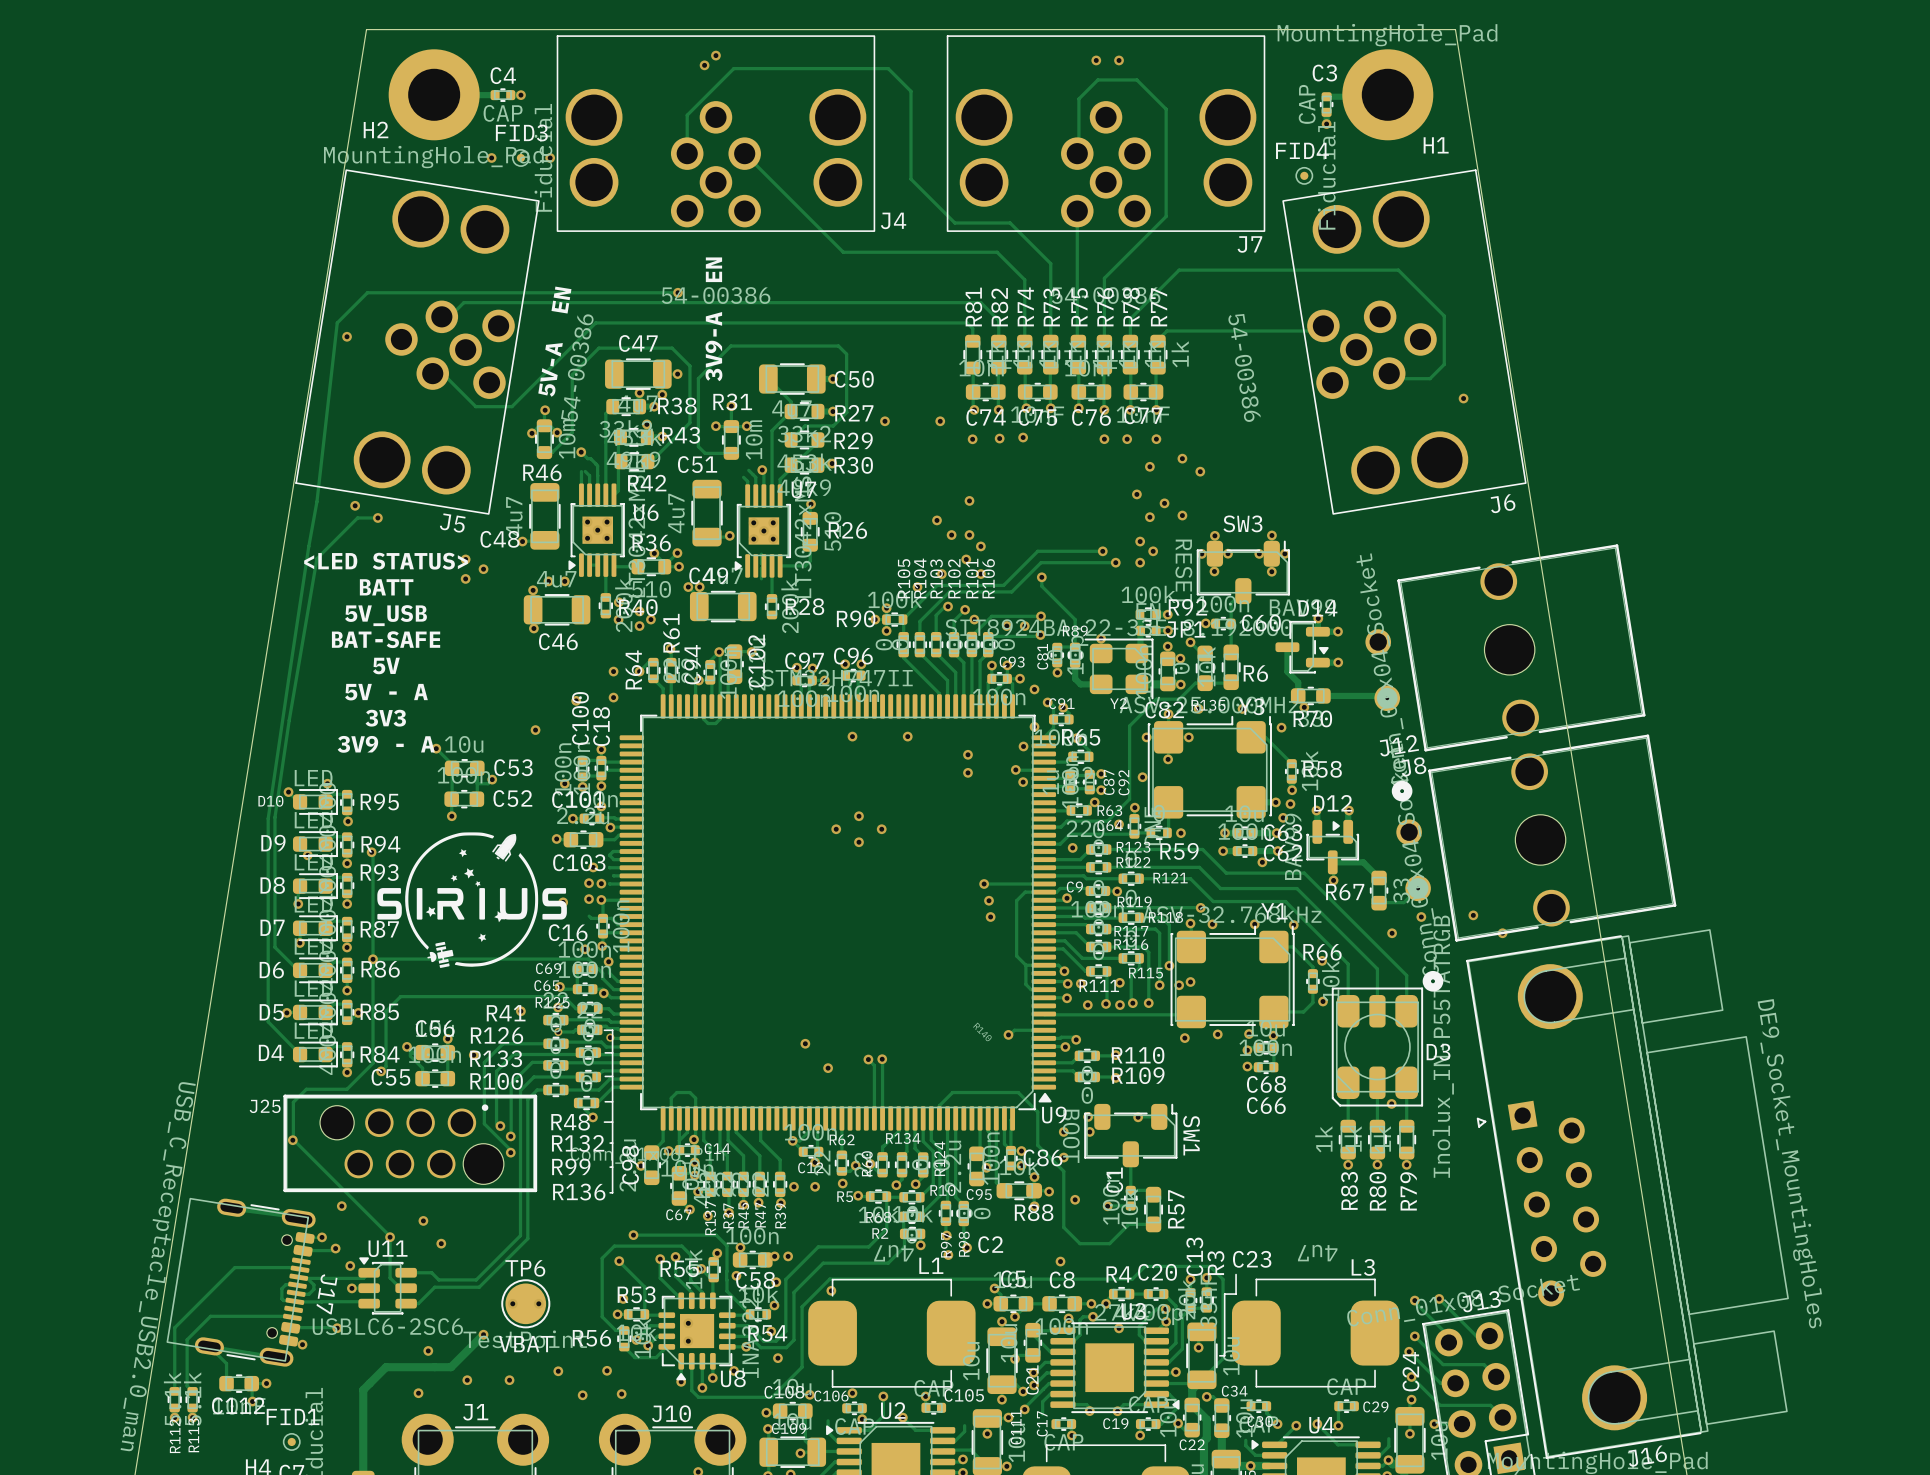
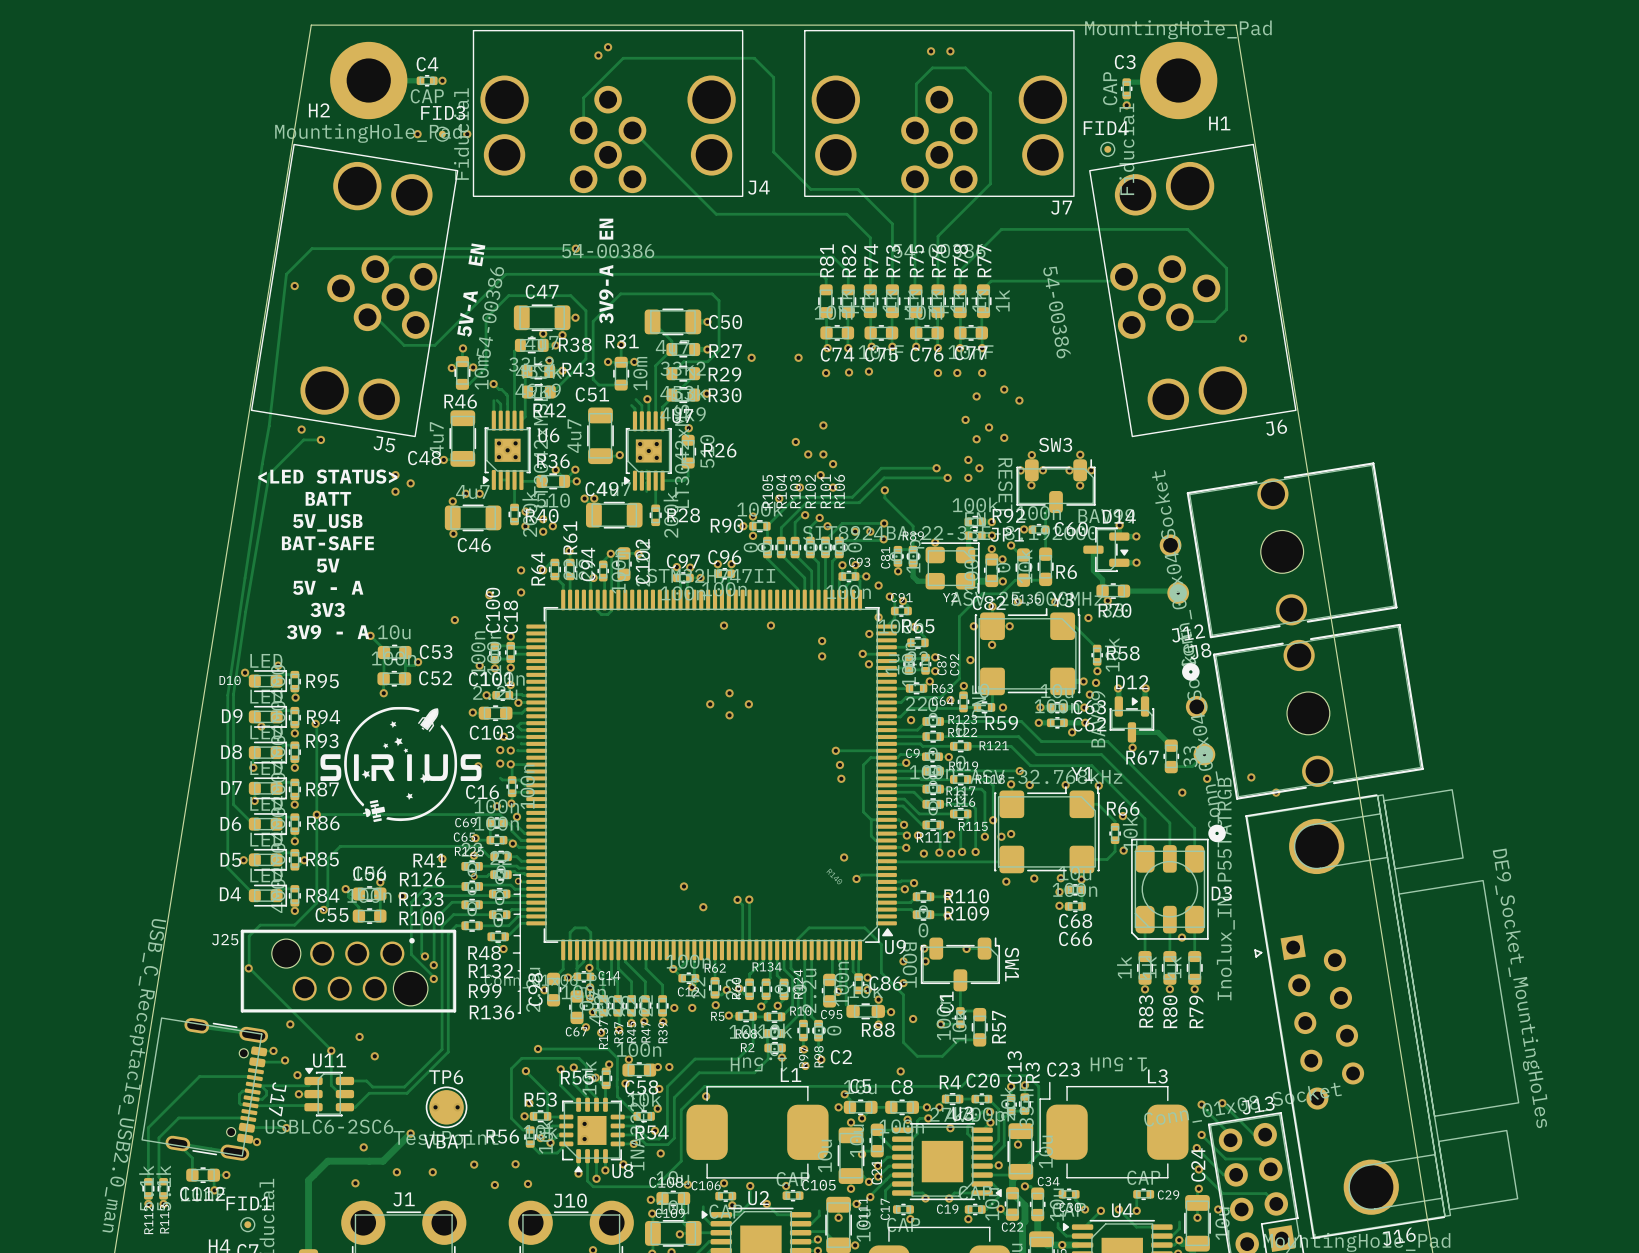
via: none -> (844, 857)
L1 value: 4u7 (893, 1253) -> 1.5uH (759, 1064)
L3 value: 4u7 (1317, 1253) -> 1.5uH (1119, 1064)

